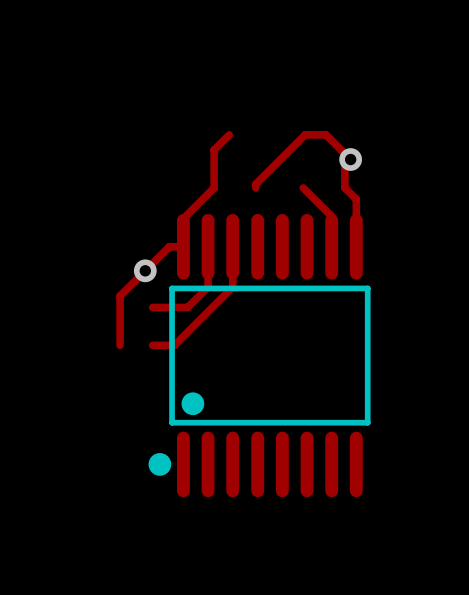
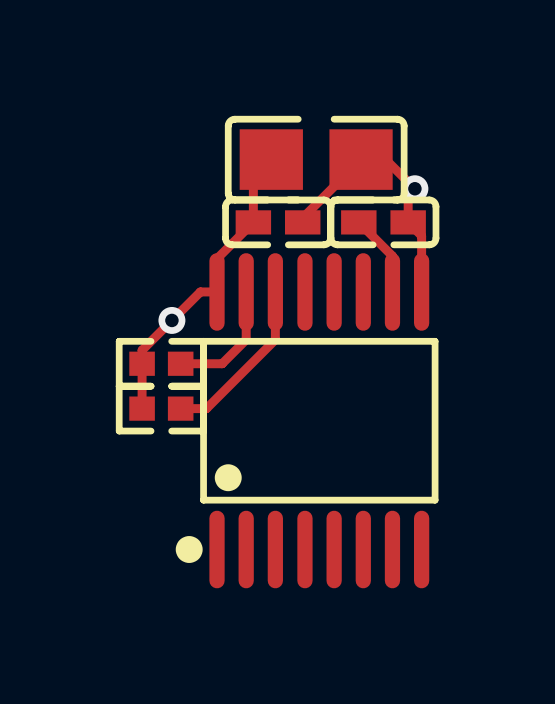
part: none -> (316, 159)
part: none -> (278, 222)
part: none -> (383, 222)
part: none -> (161, 363)
part: none -> (161, 408)

